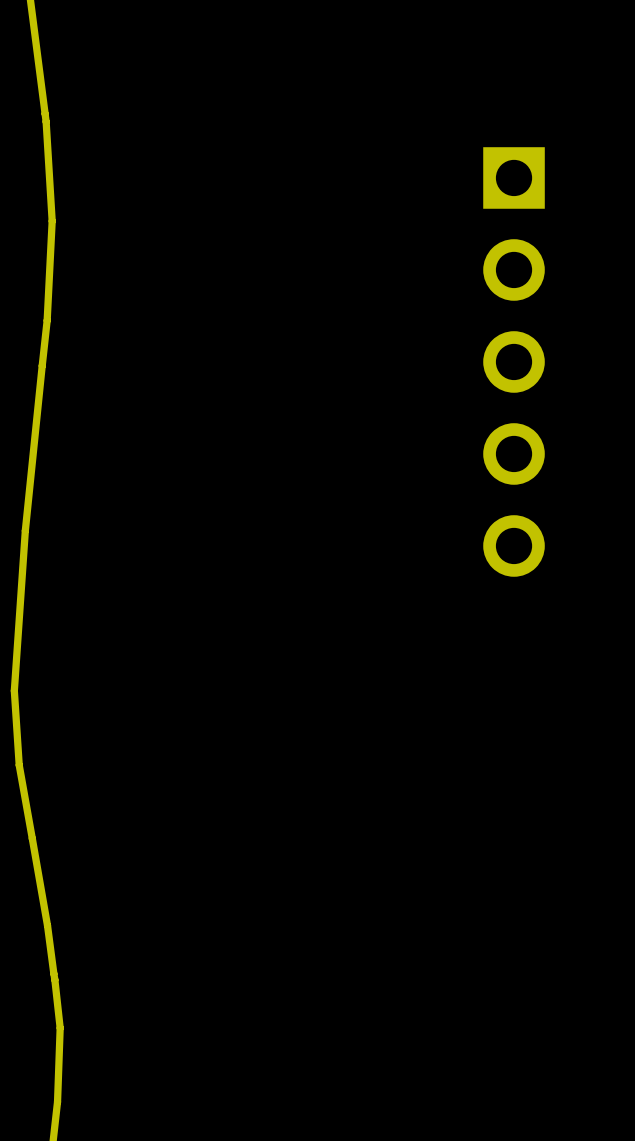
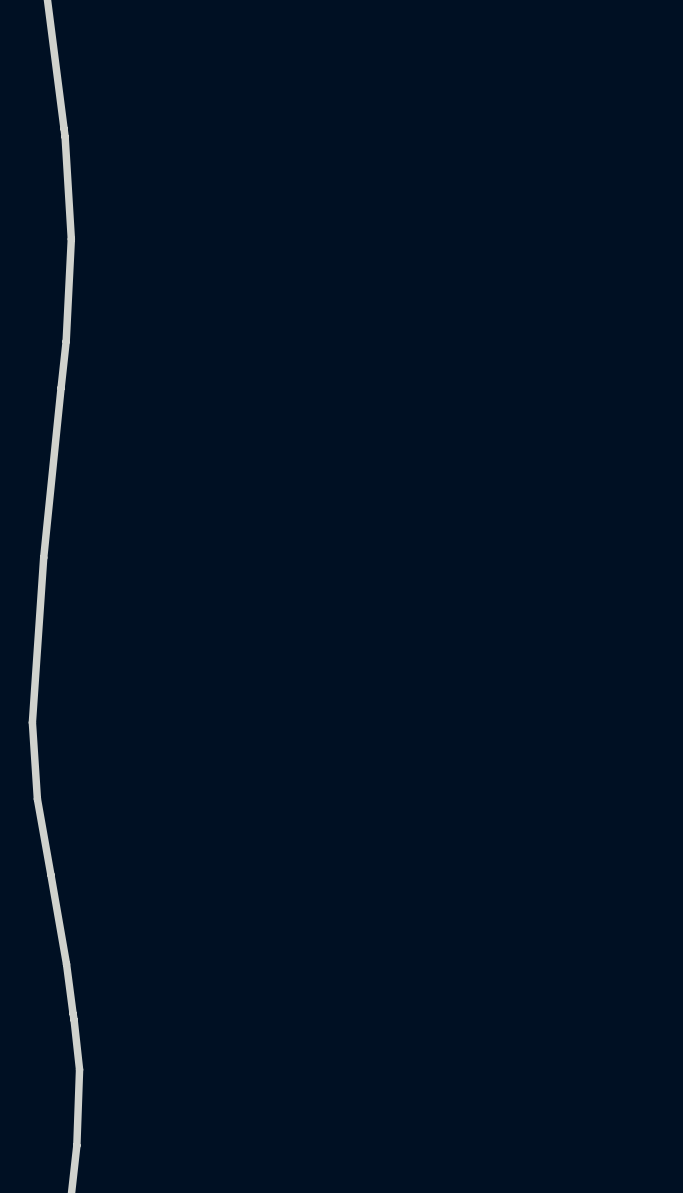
part: (514, 361) -> none

